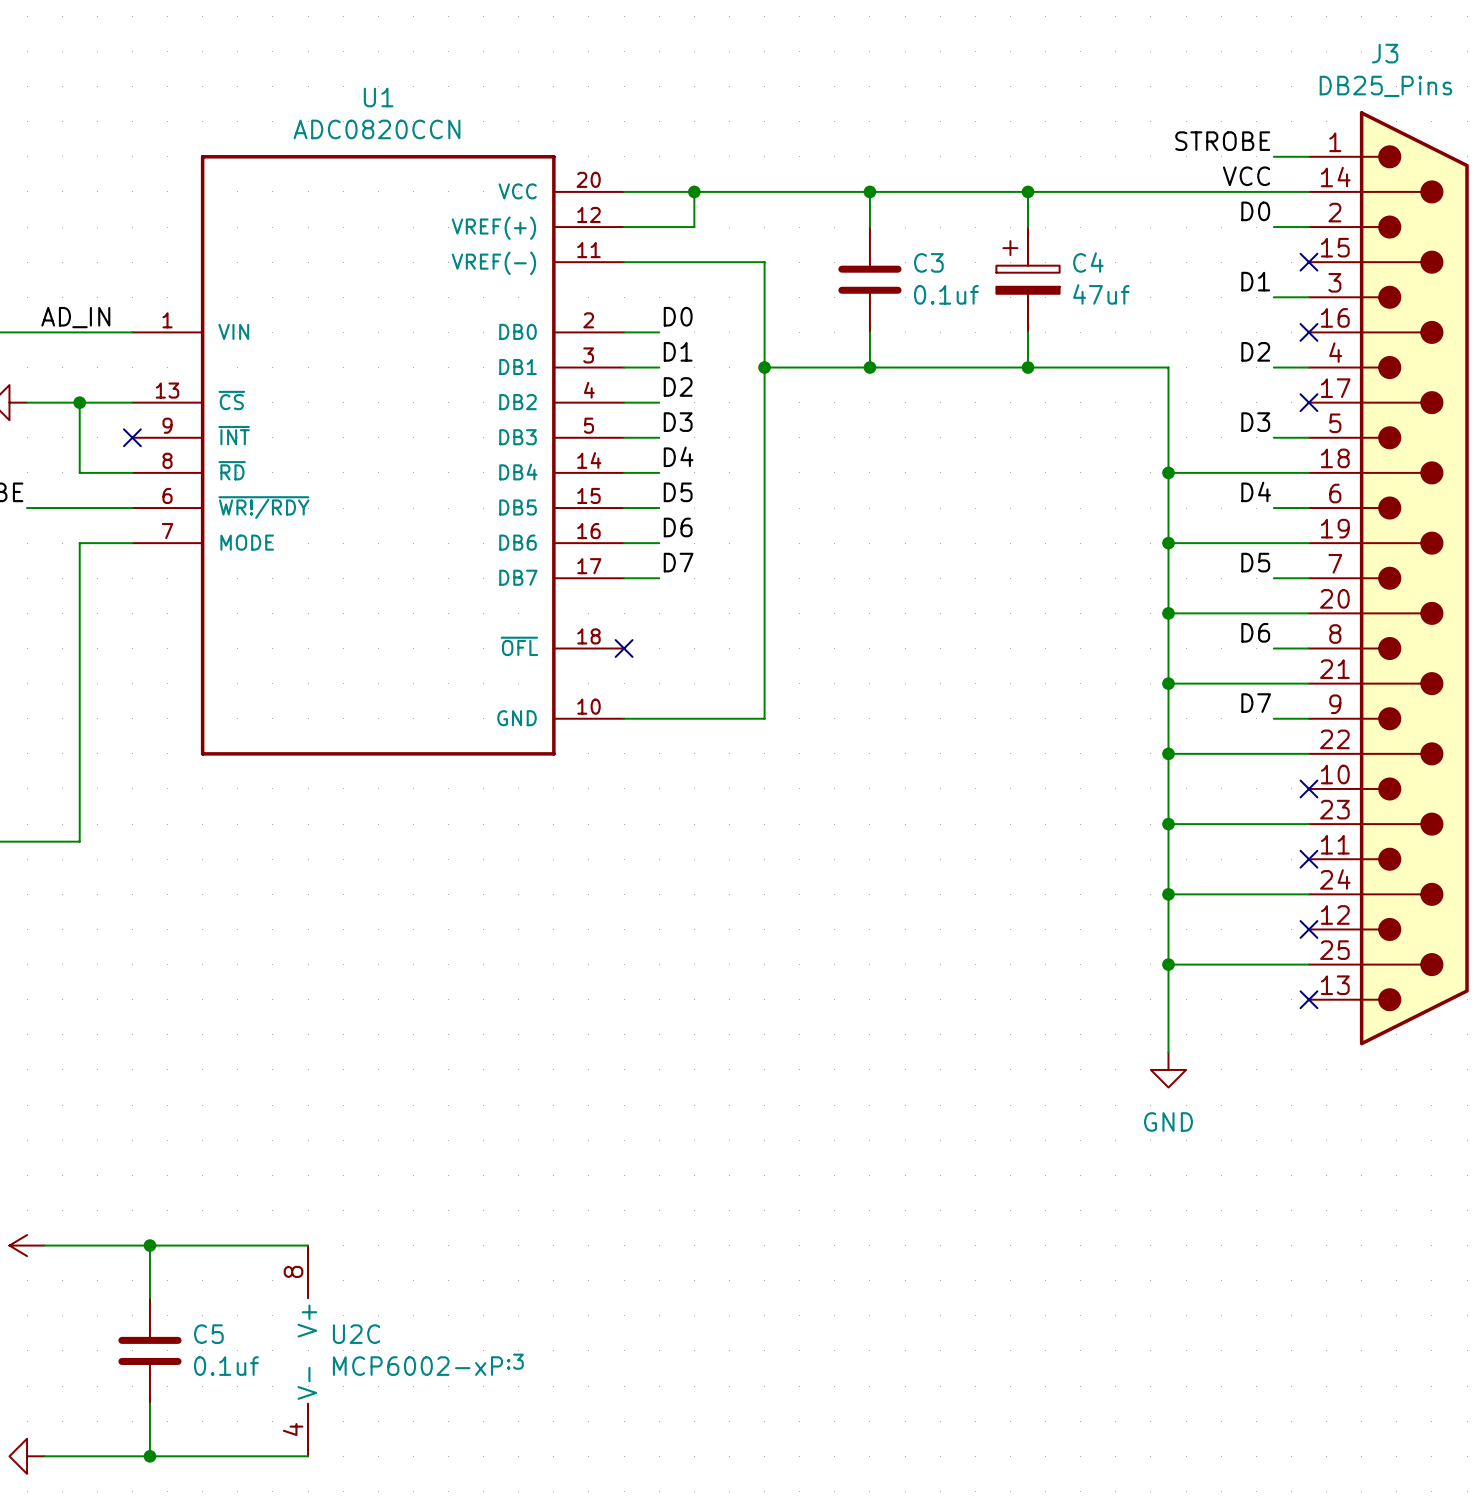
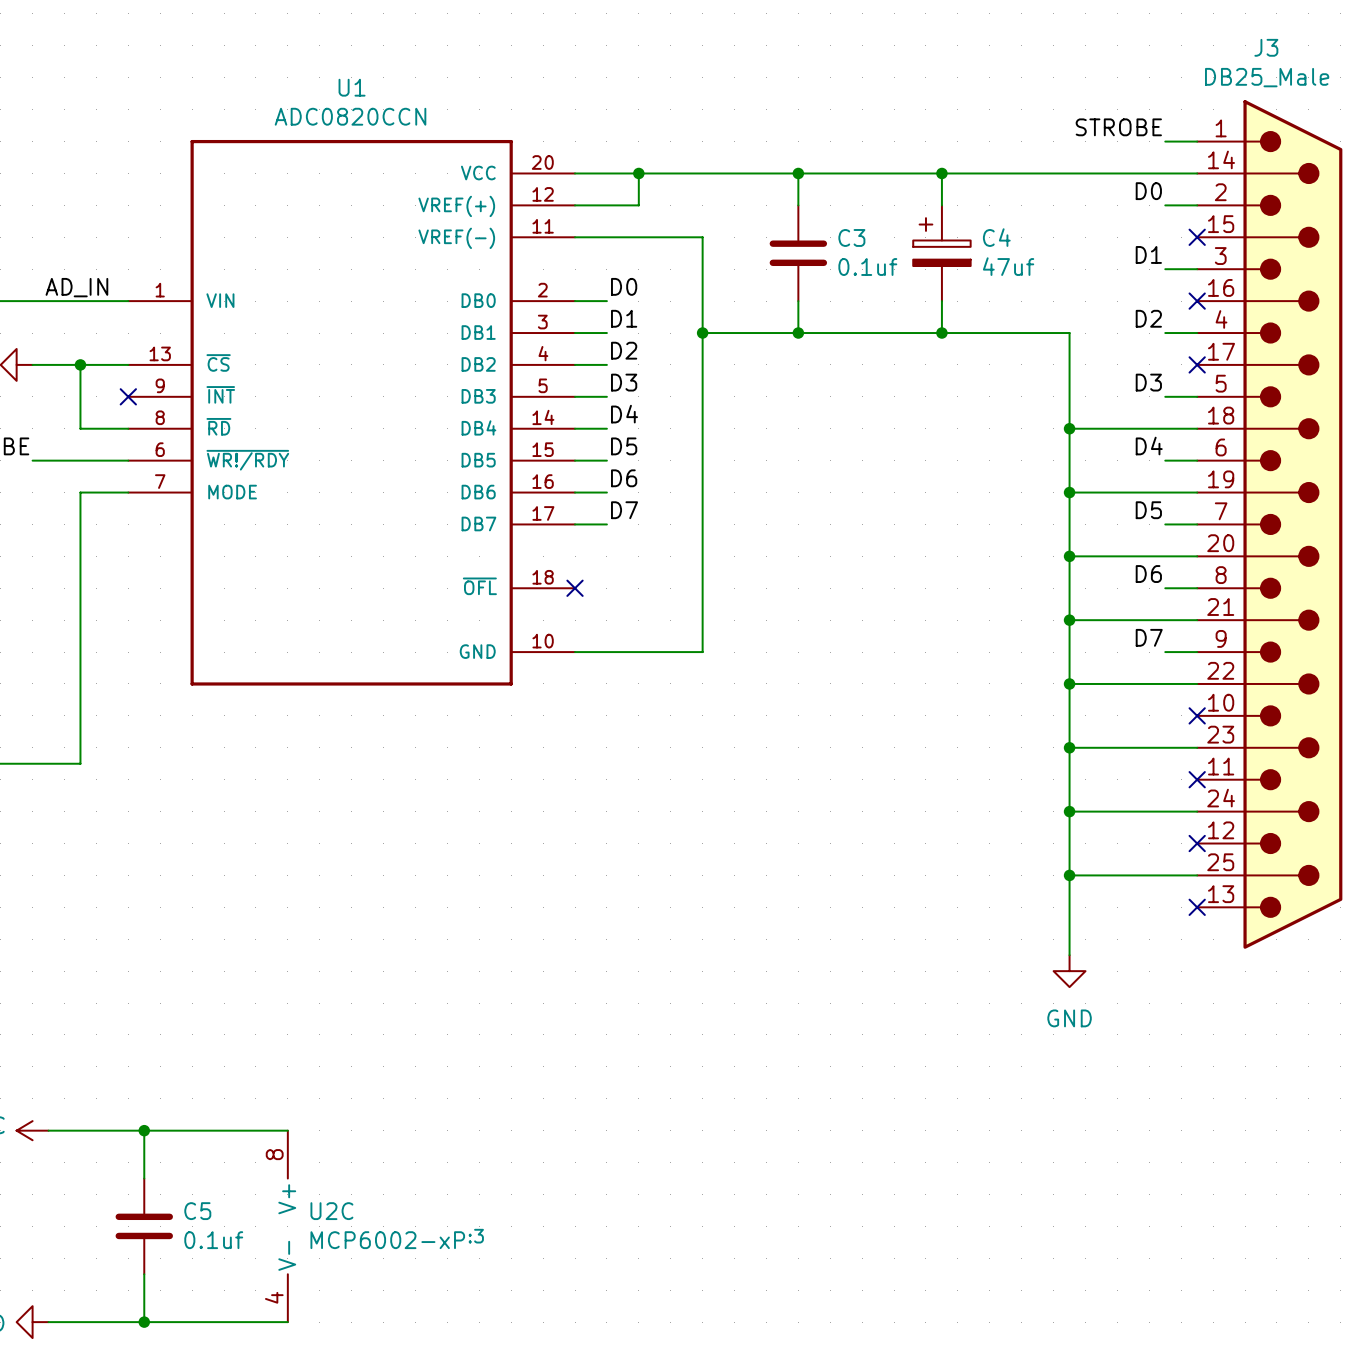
J3 value: DB25_Pins (1385, 86) -> DB25_Male (1267, 77)
label: VCC (1246, 176) -> none

